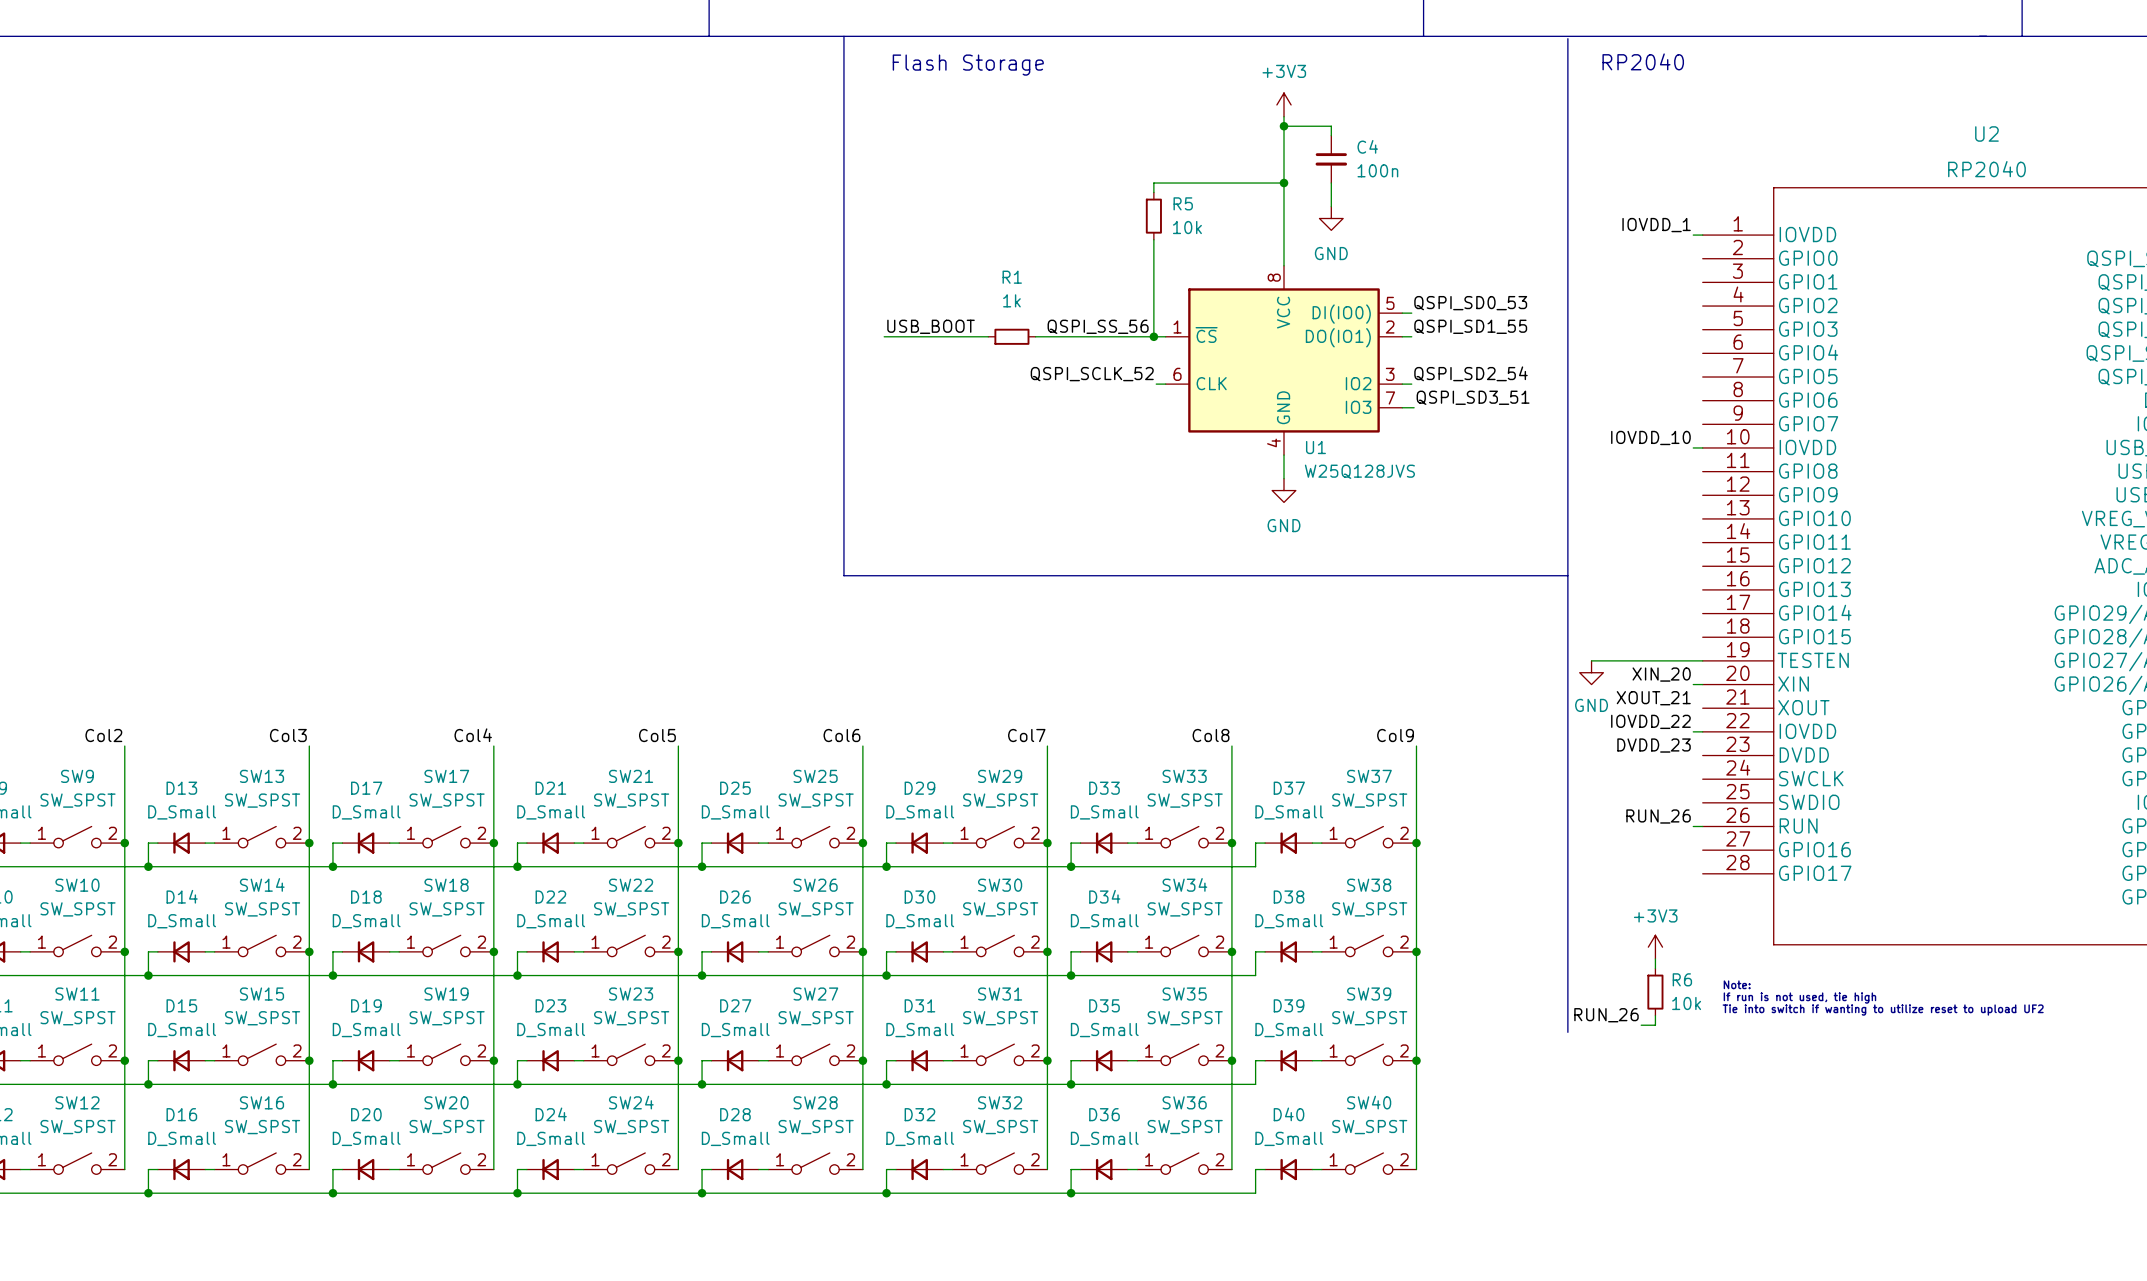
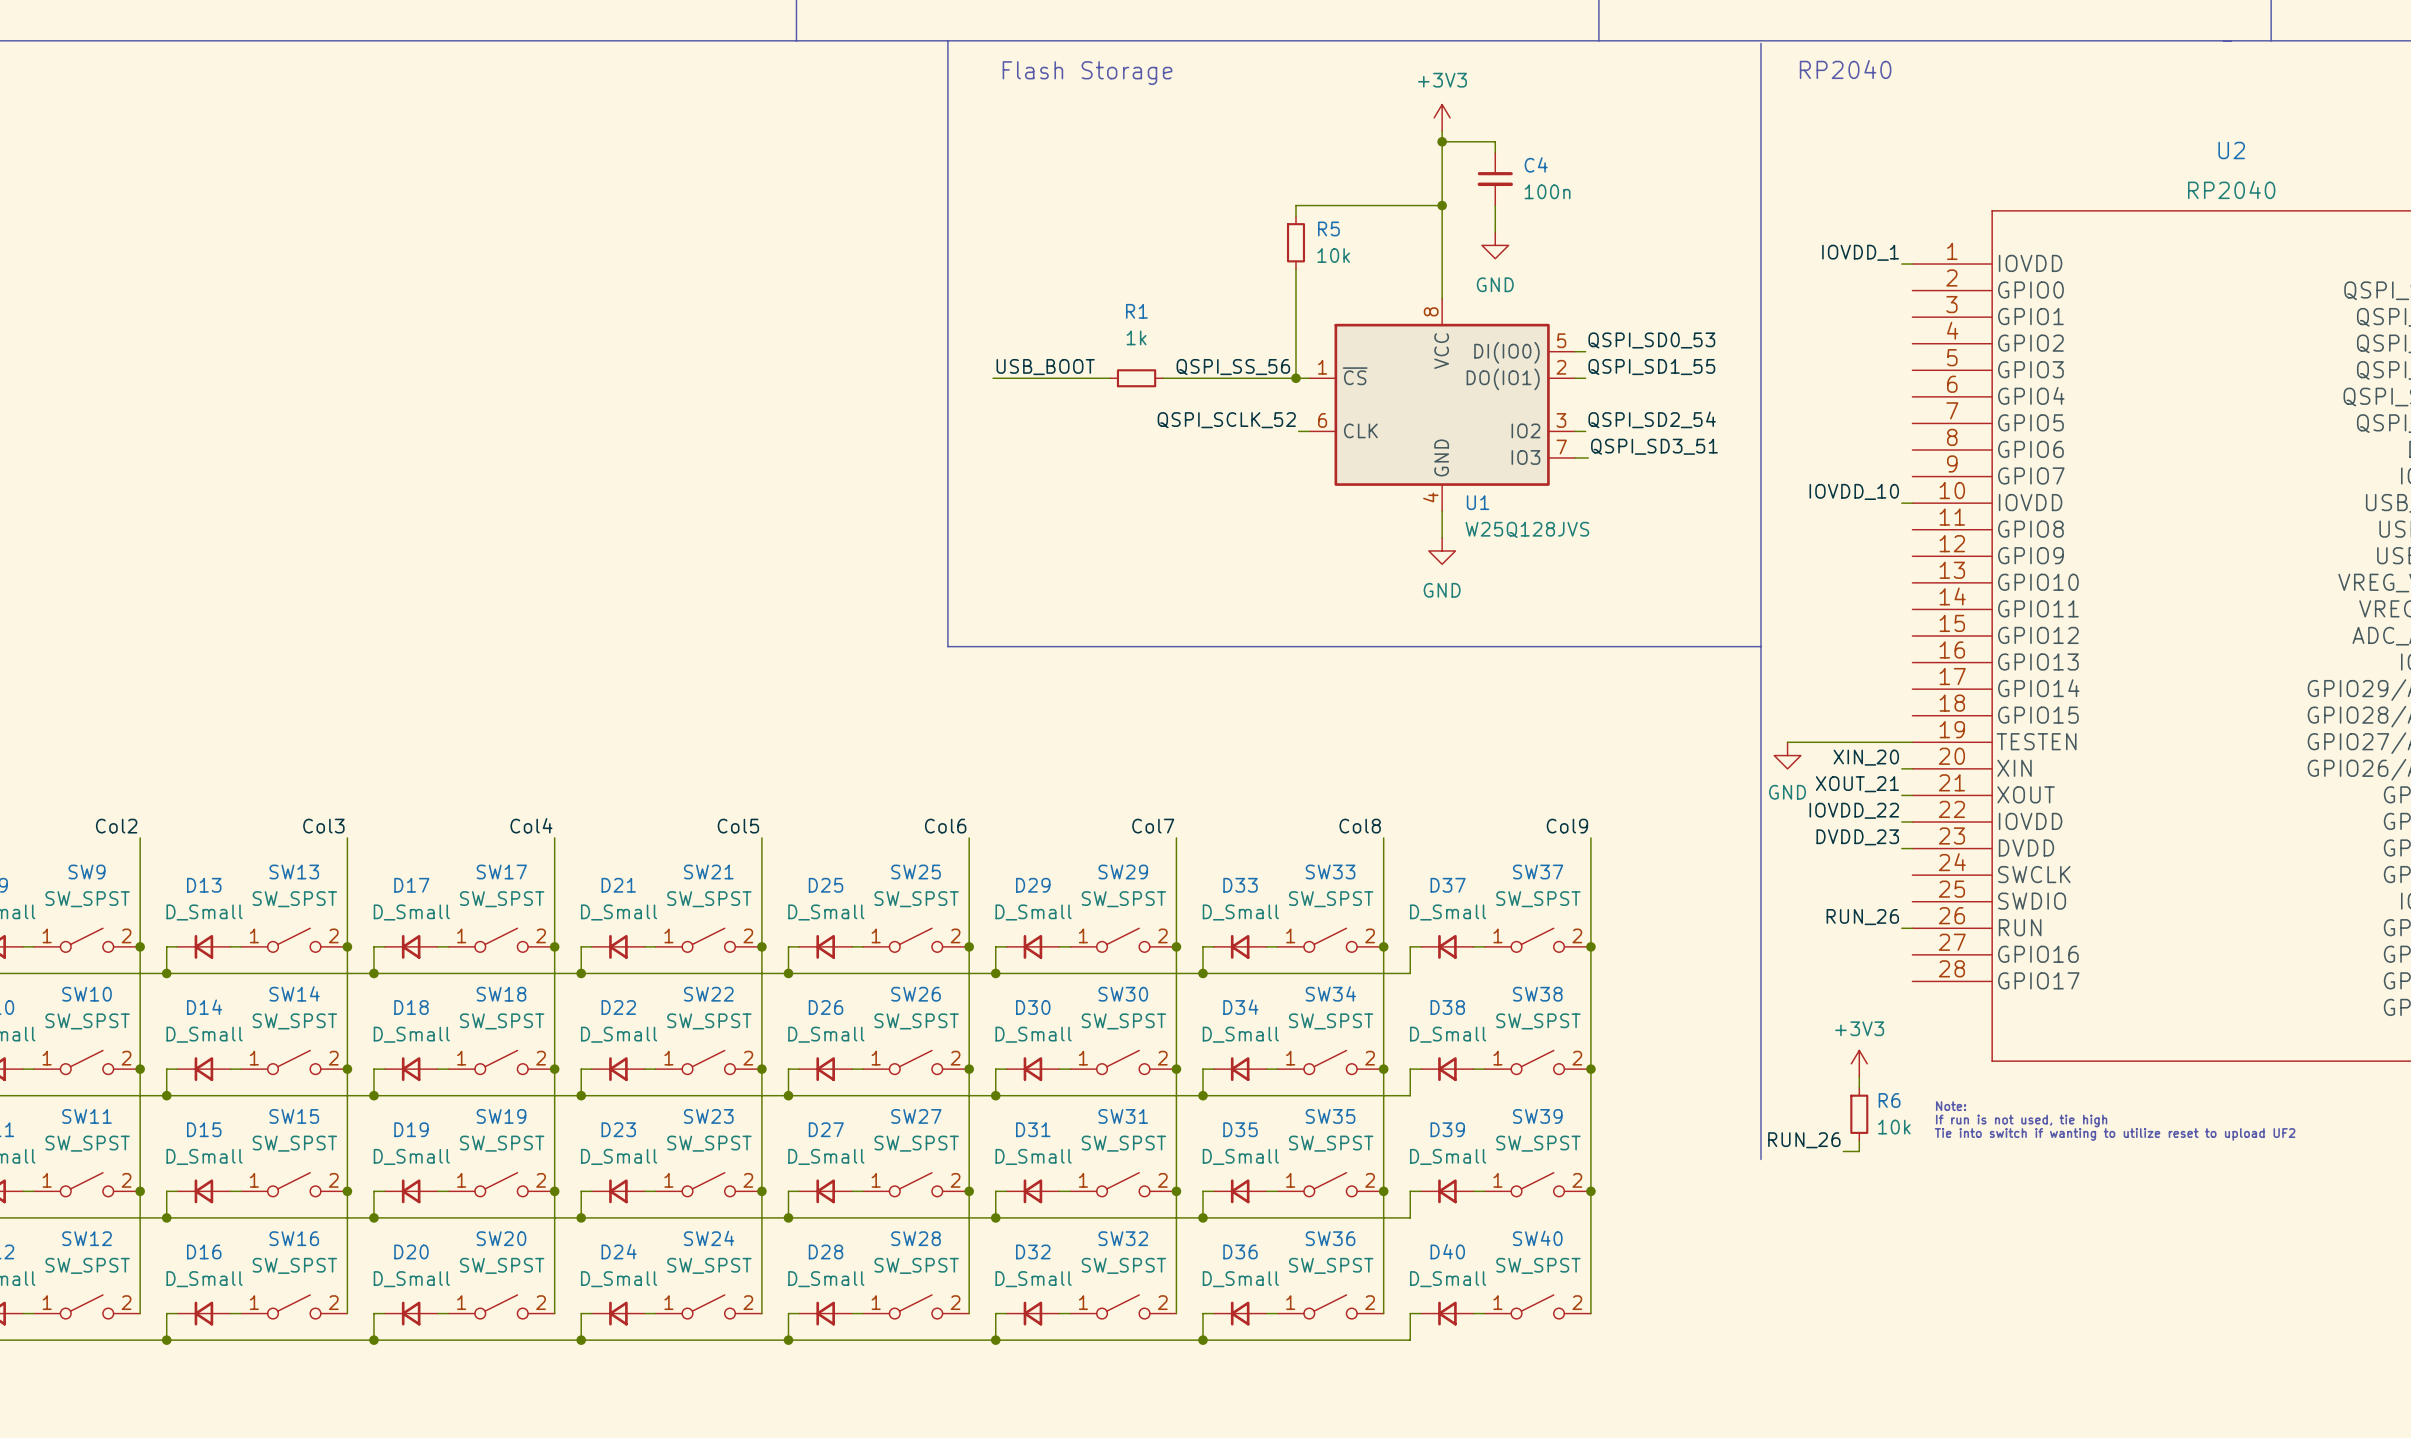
wire: none -> (1901, 795) (1912, 795)
wire: none -> (1901, 848) (1912, 848)

